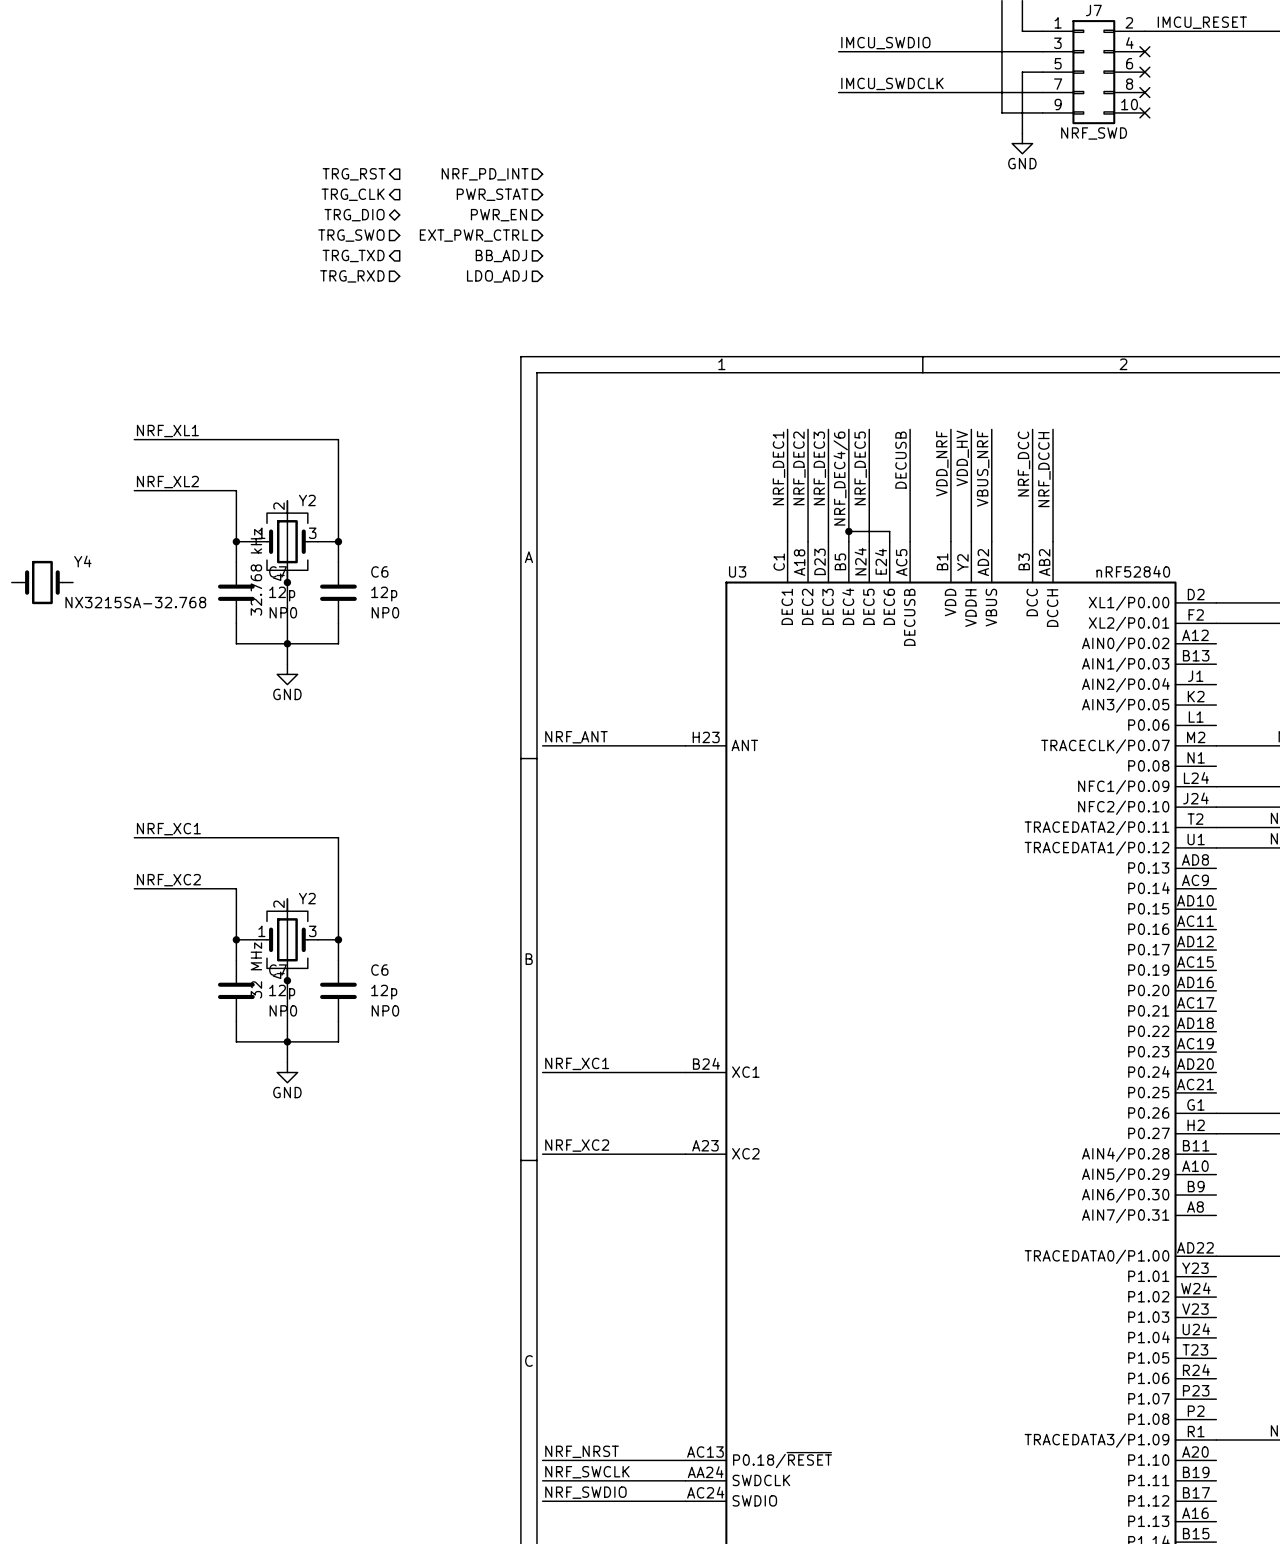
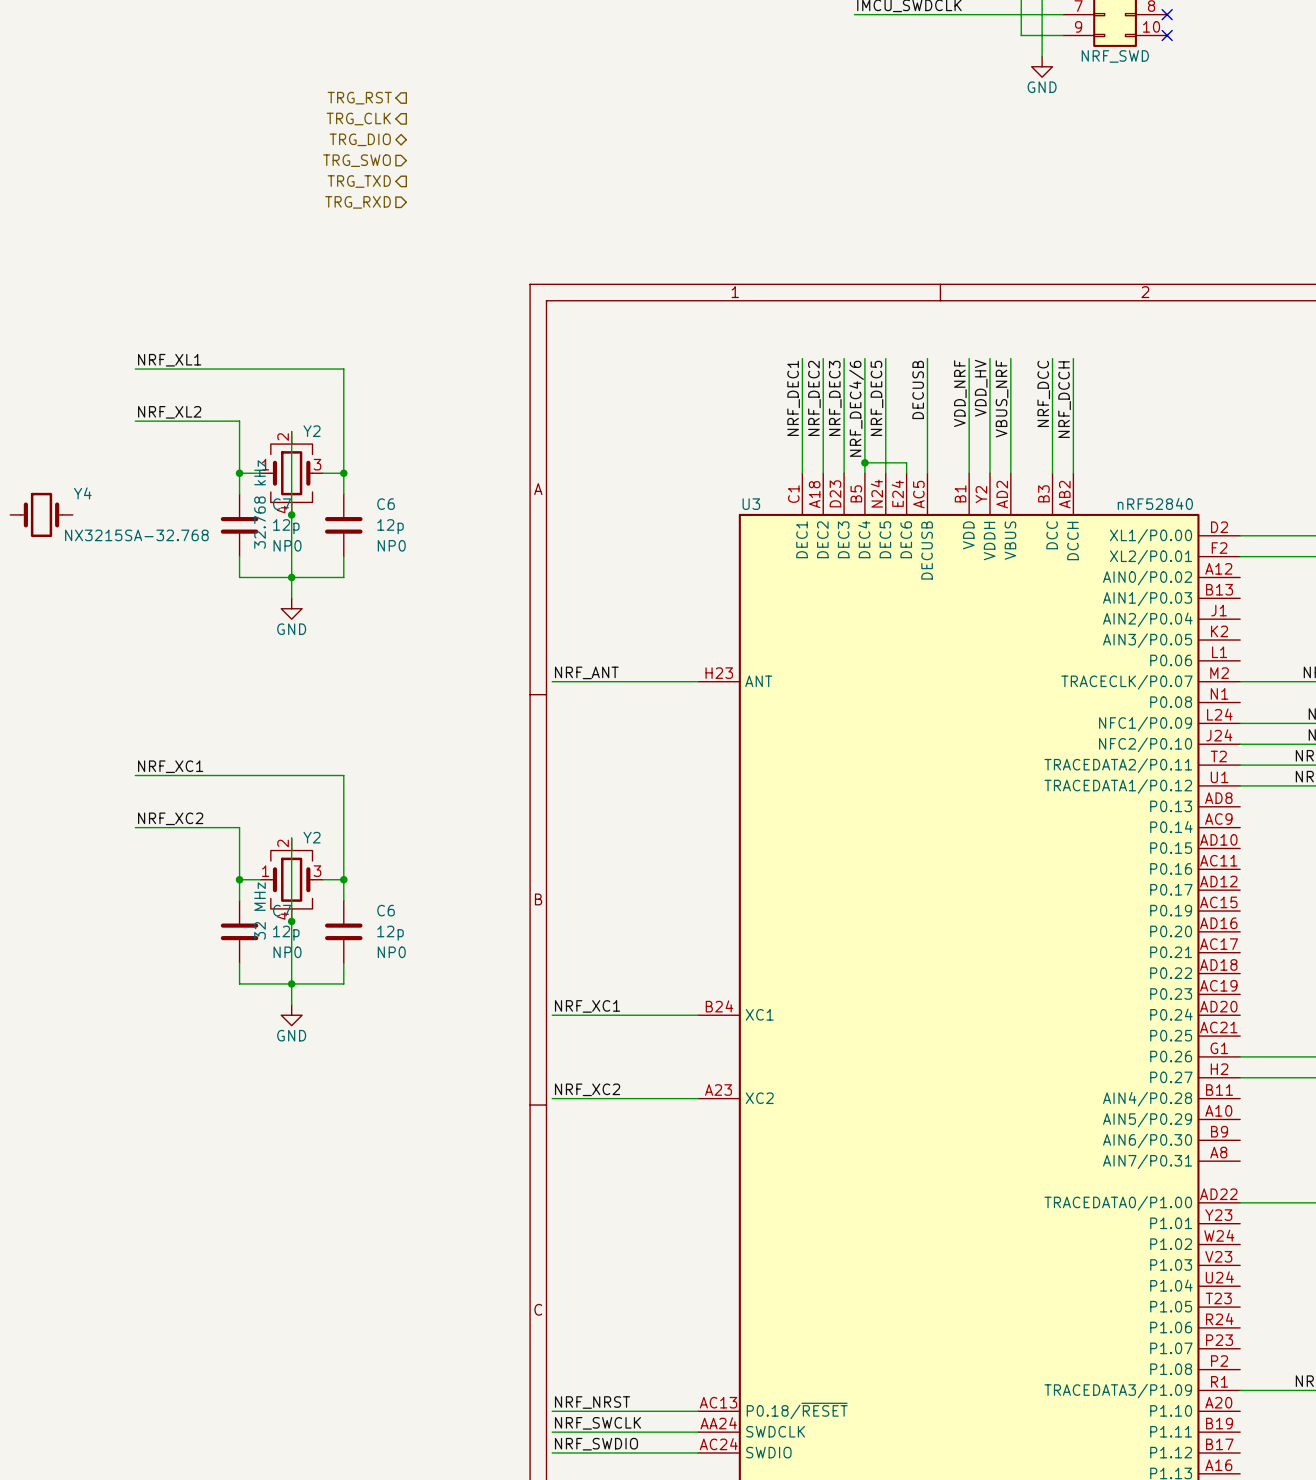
hierarchical label: NRF_PD_INT (485, 174) -> none
hierarchical label: PWR_STAT (492, 194) -> none
hierarchical label: PWR_EN (498, 215) -> none
hierarchical label: EXT_PWR_CTRL (474, 235) -> none
hierarchical label: BB_ADJ (501, 255) -> none
hierarchical label: LDO_ADJ (497, 276) -> none

